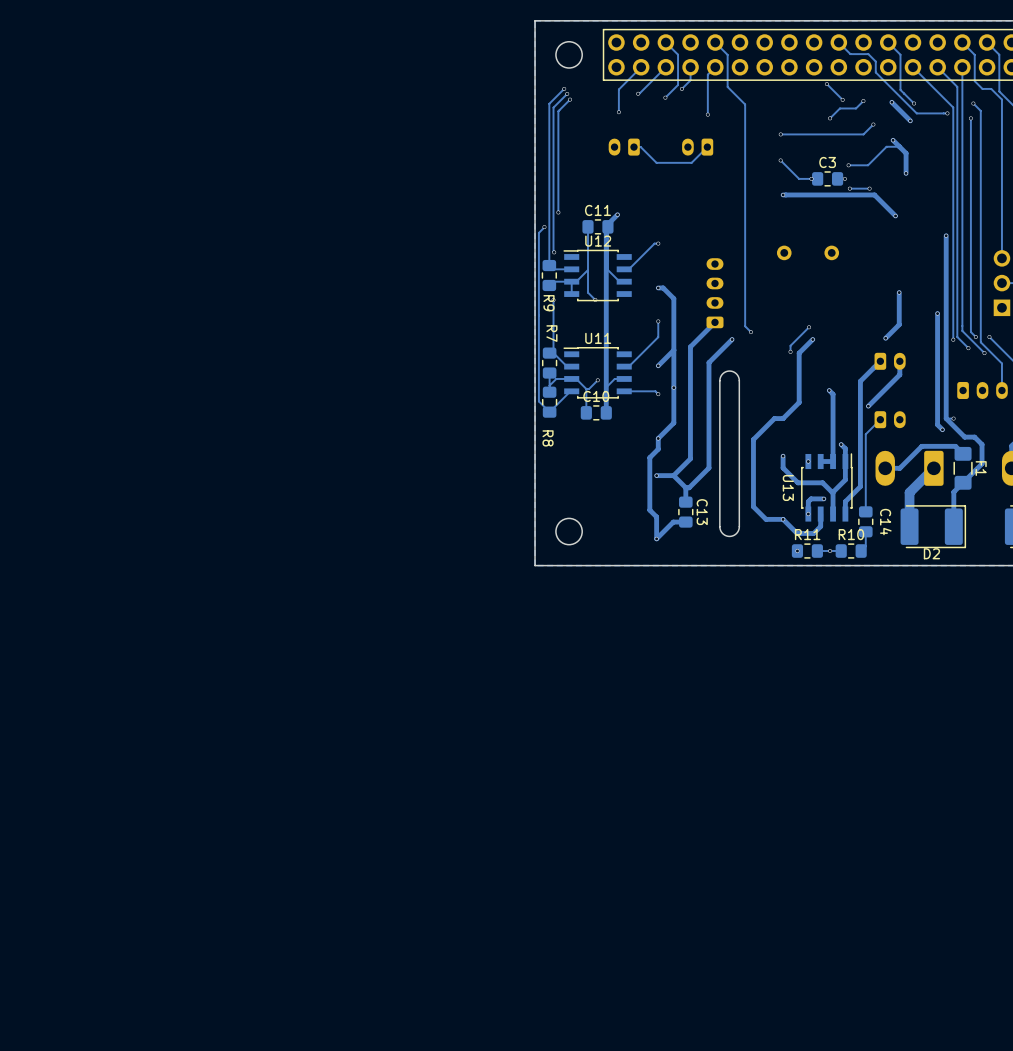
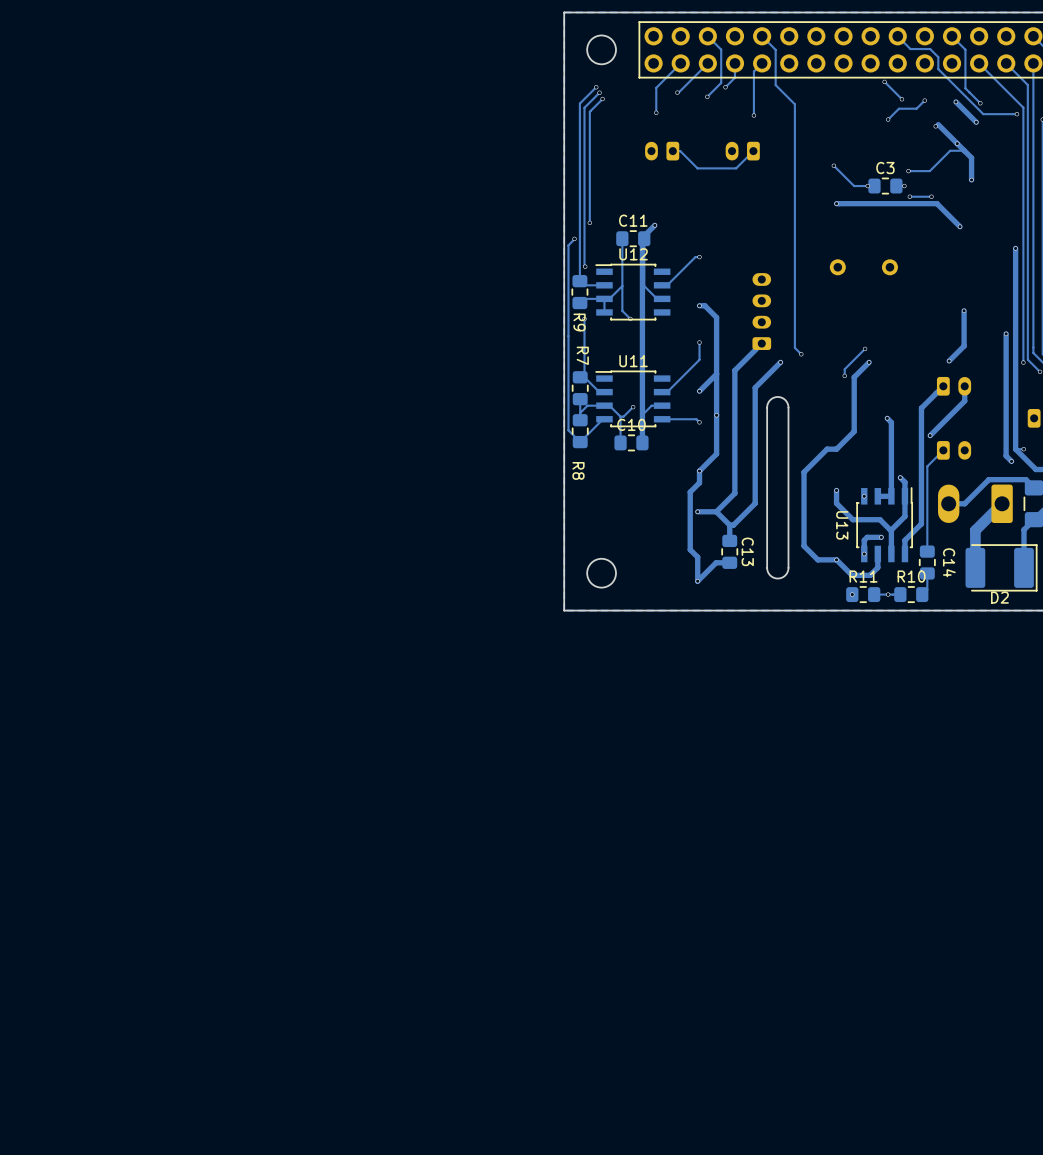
track: none -> (938, 124) (957, 143)
track: (873, 124) (863, 134) (780, 134) -> none
via: (780, 134) -> none

